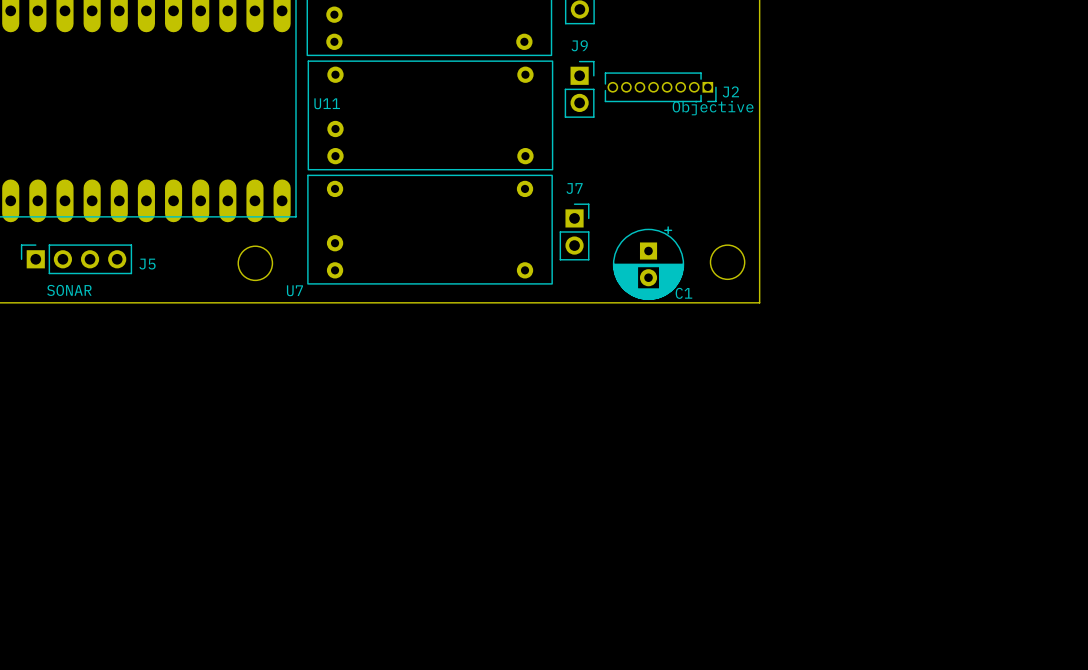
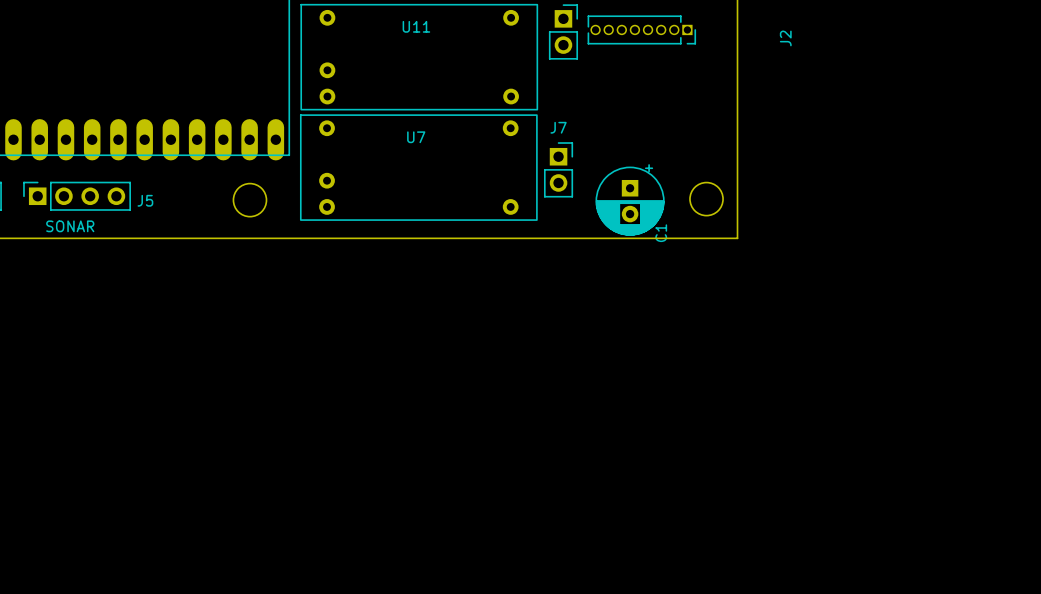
J2 name rotation: 0° (730, 91) -> 90° counterclockwise (785, 38)
J2 name position: J2 (730, 91) -> J2 (785, 38)
U11 name position: U11 (327, 103) -> U11 (416, 26)
J2 value: Objective (713, 108) -> none
U7 name position: U7 (294, 290) -> U7 (416, 137)
C1 name rotation: 0° (683, 293) -> 90° counterclockwise (661, 233)

